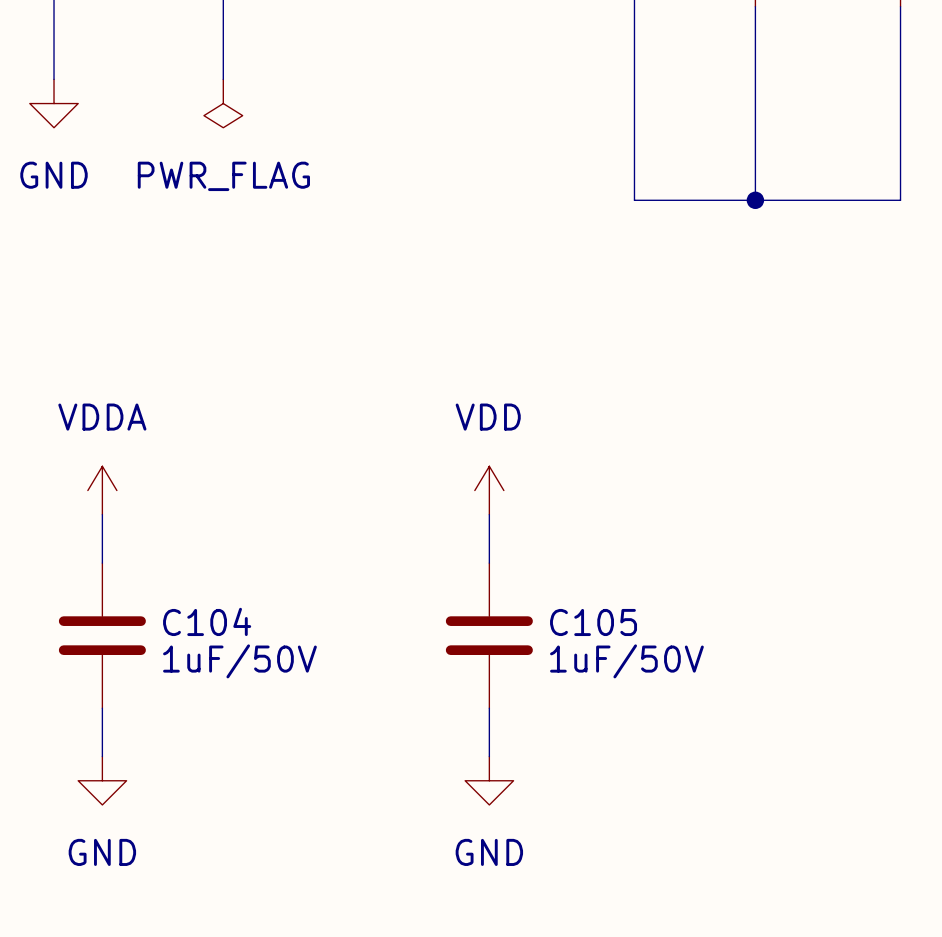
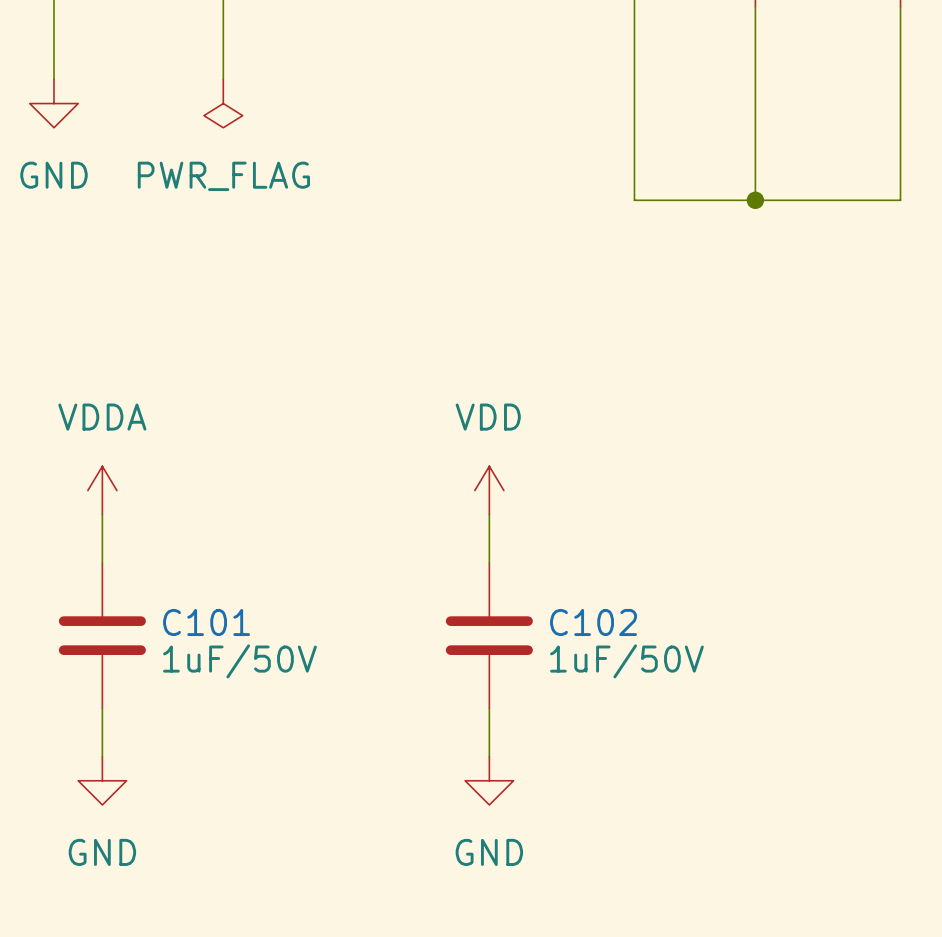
C104 name: C104 (207, 621) -> C101 (206, 622)
C105 name: C105 (593, 622) -> C102 (593, 622)

